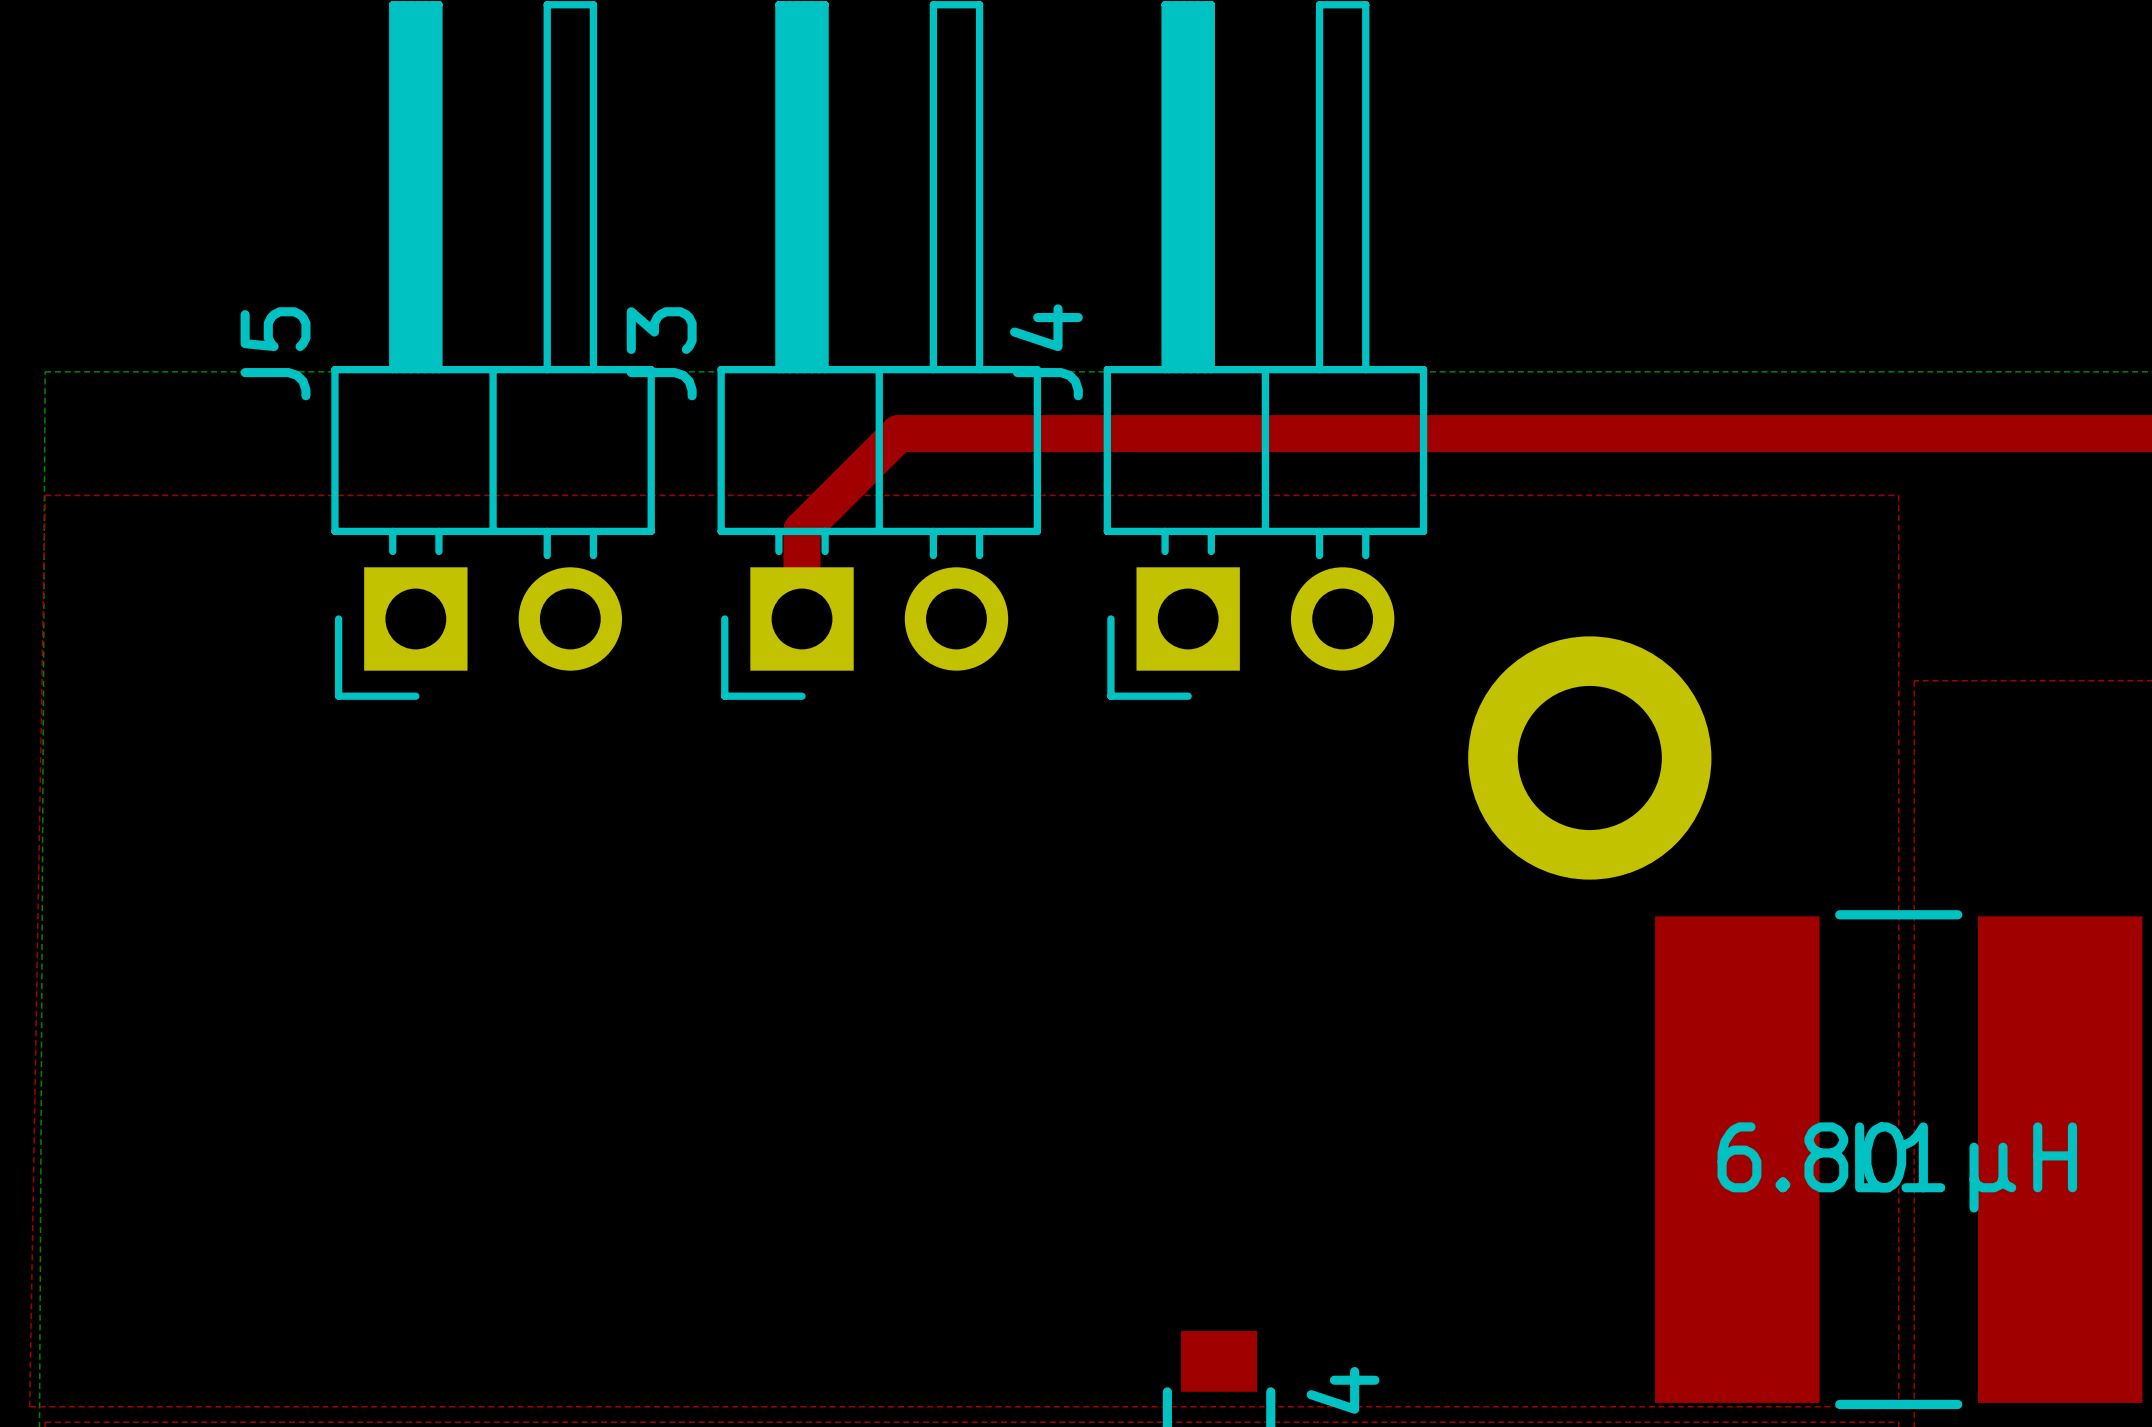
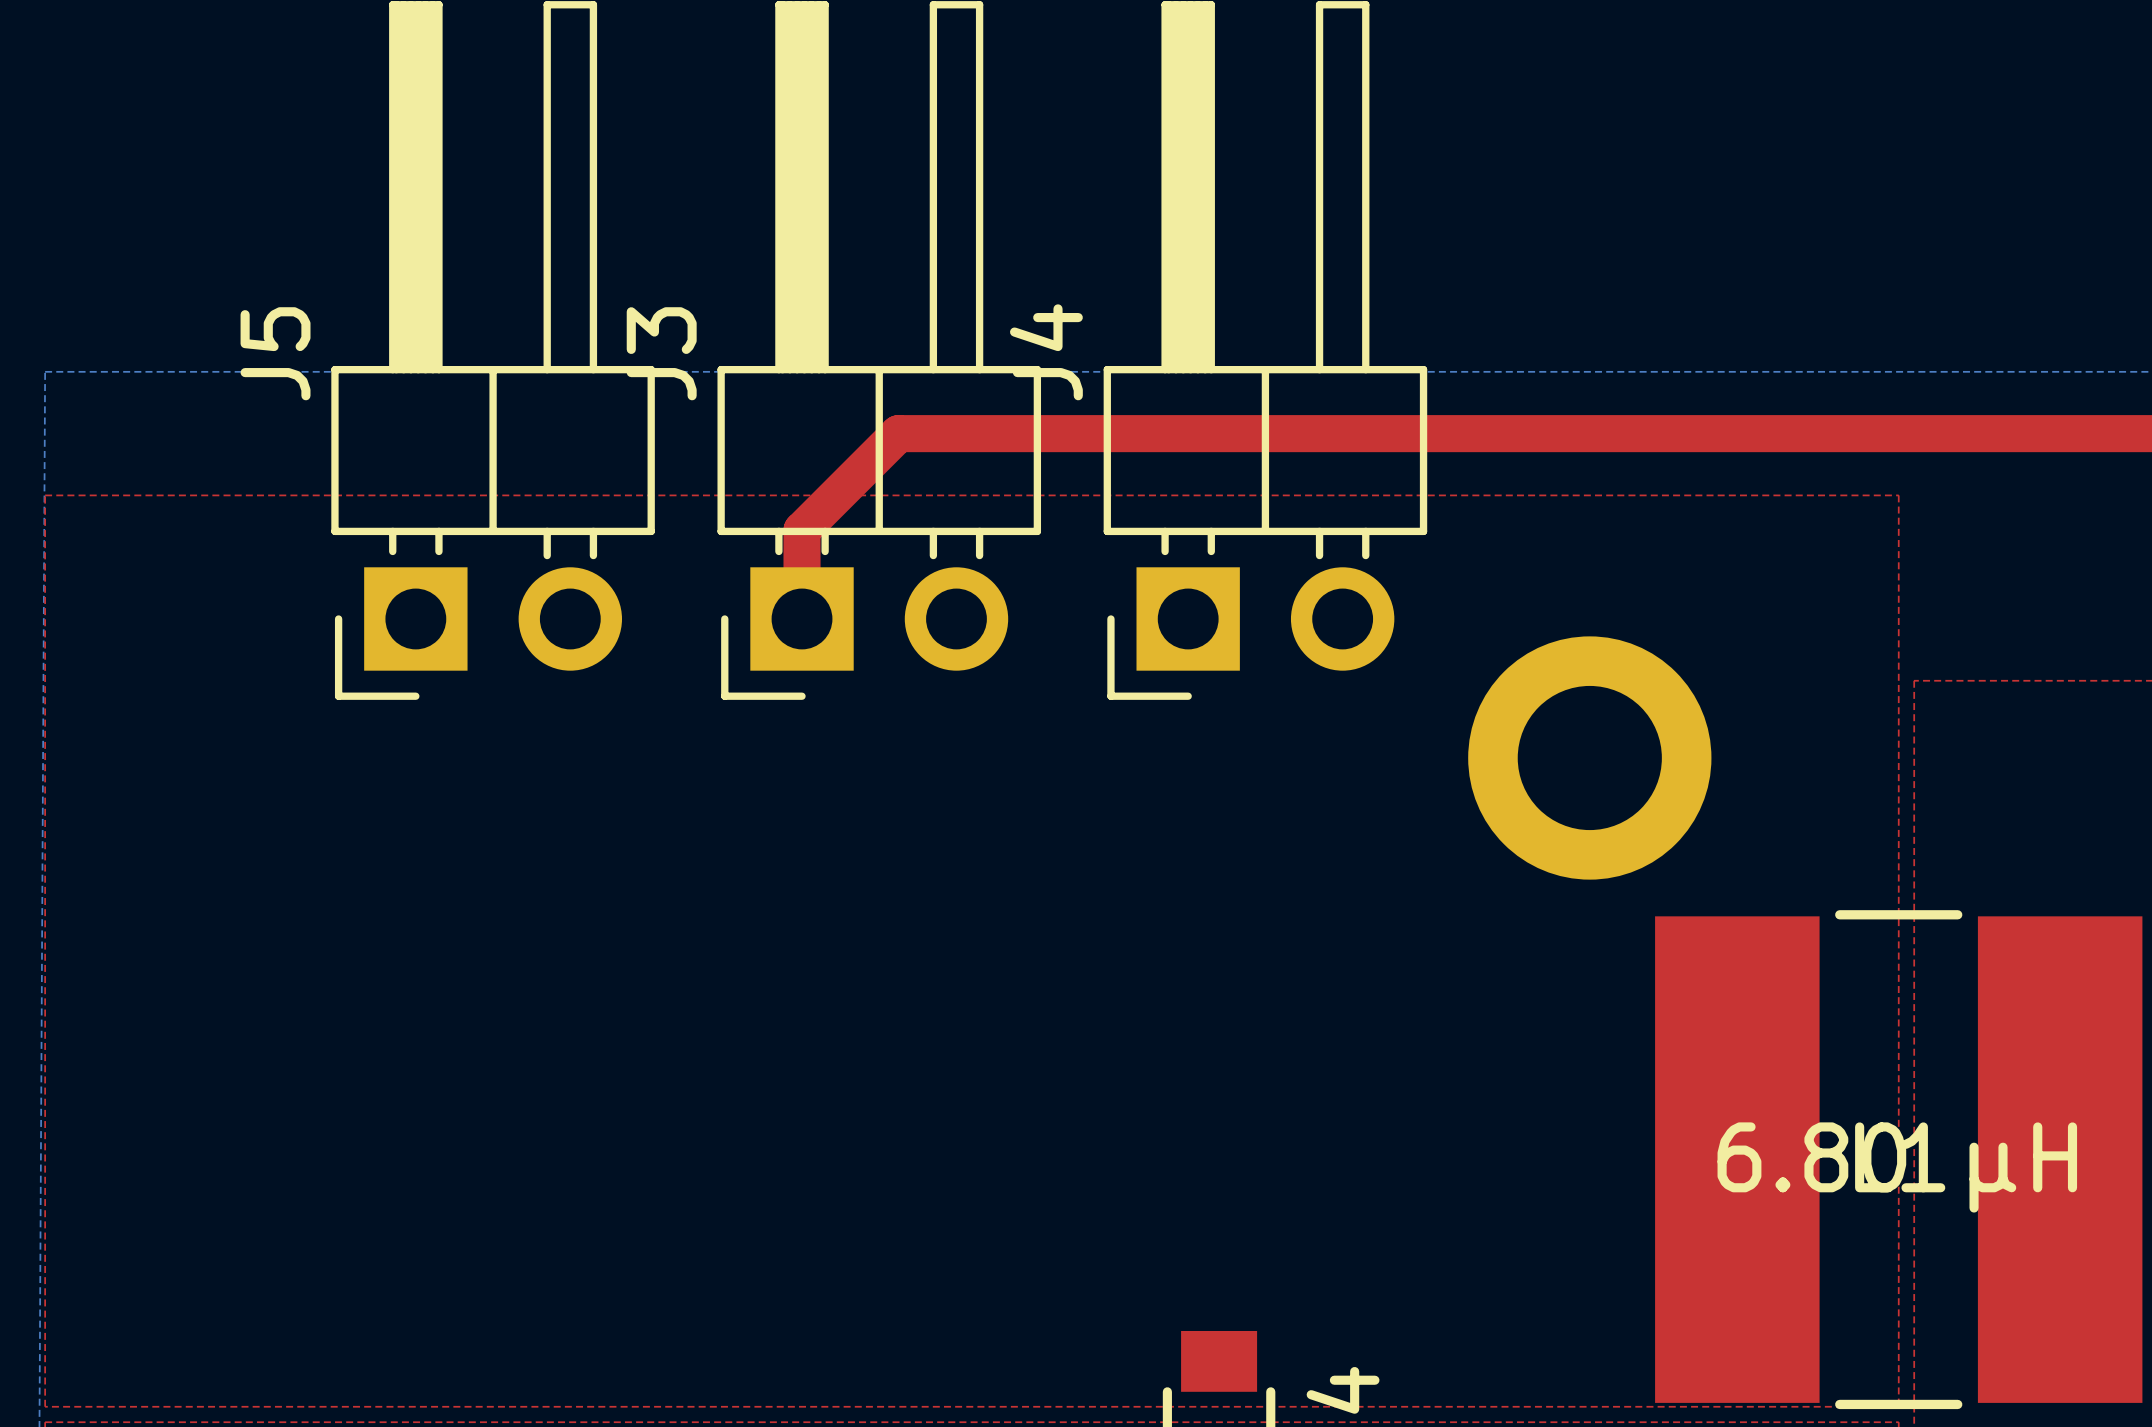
top zone outline: (45, 495) (29, 1406) (45, 1406) -> (45, 495) (45, 1406)

